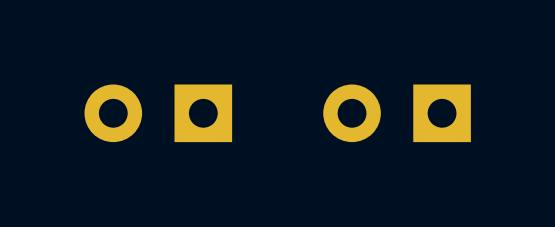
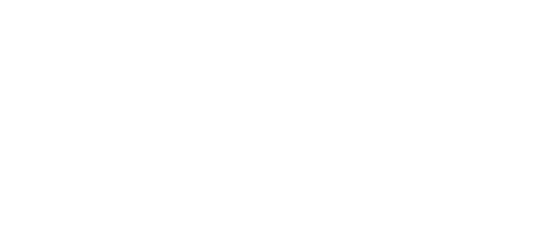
part: (158, 113) -> none
part: (397, 113) -> none

